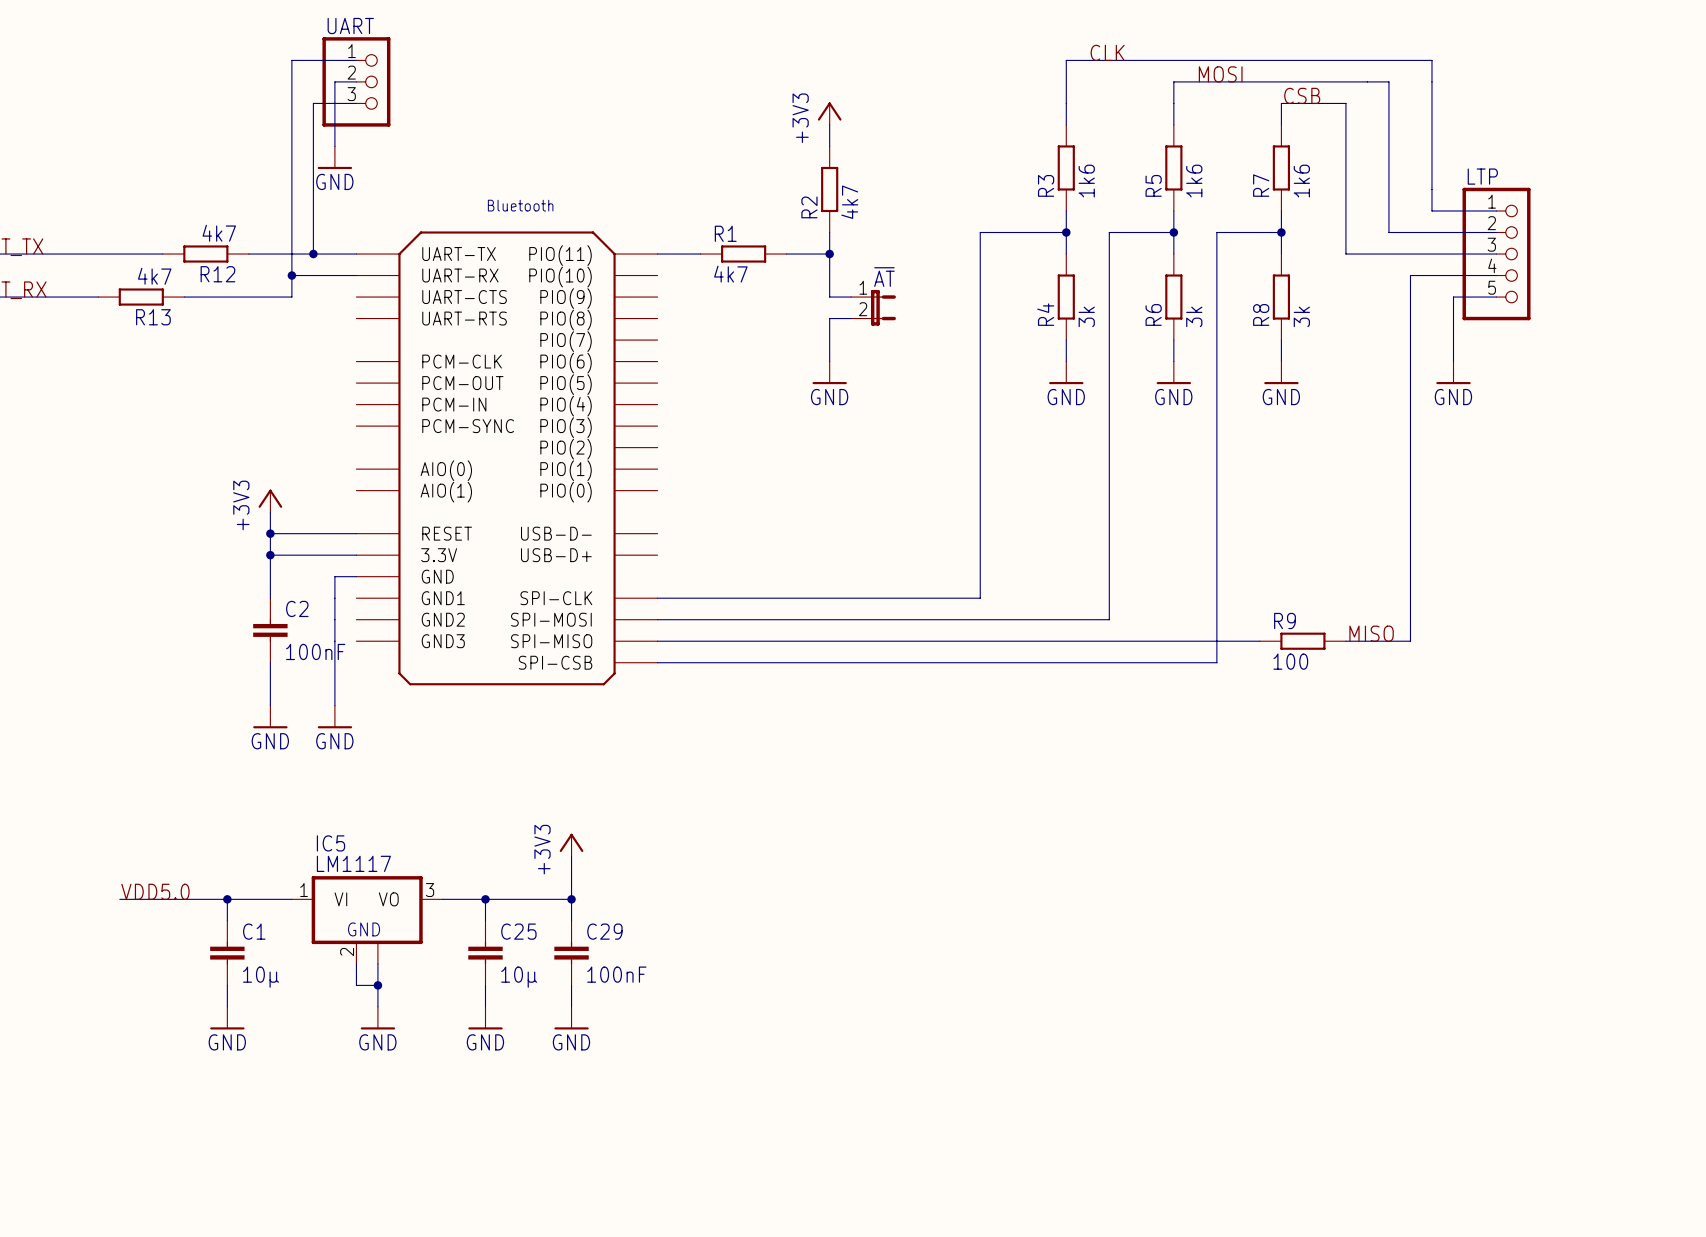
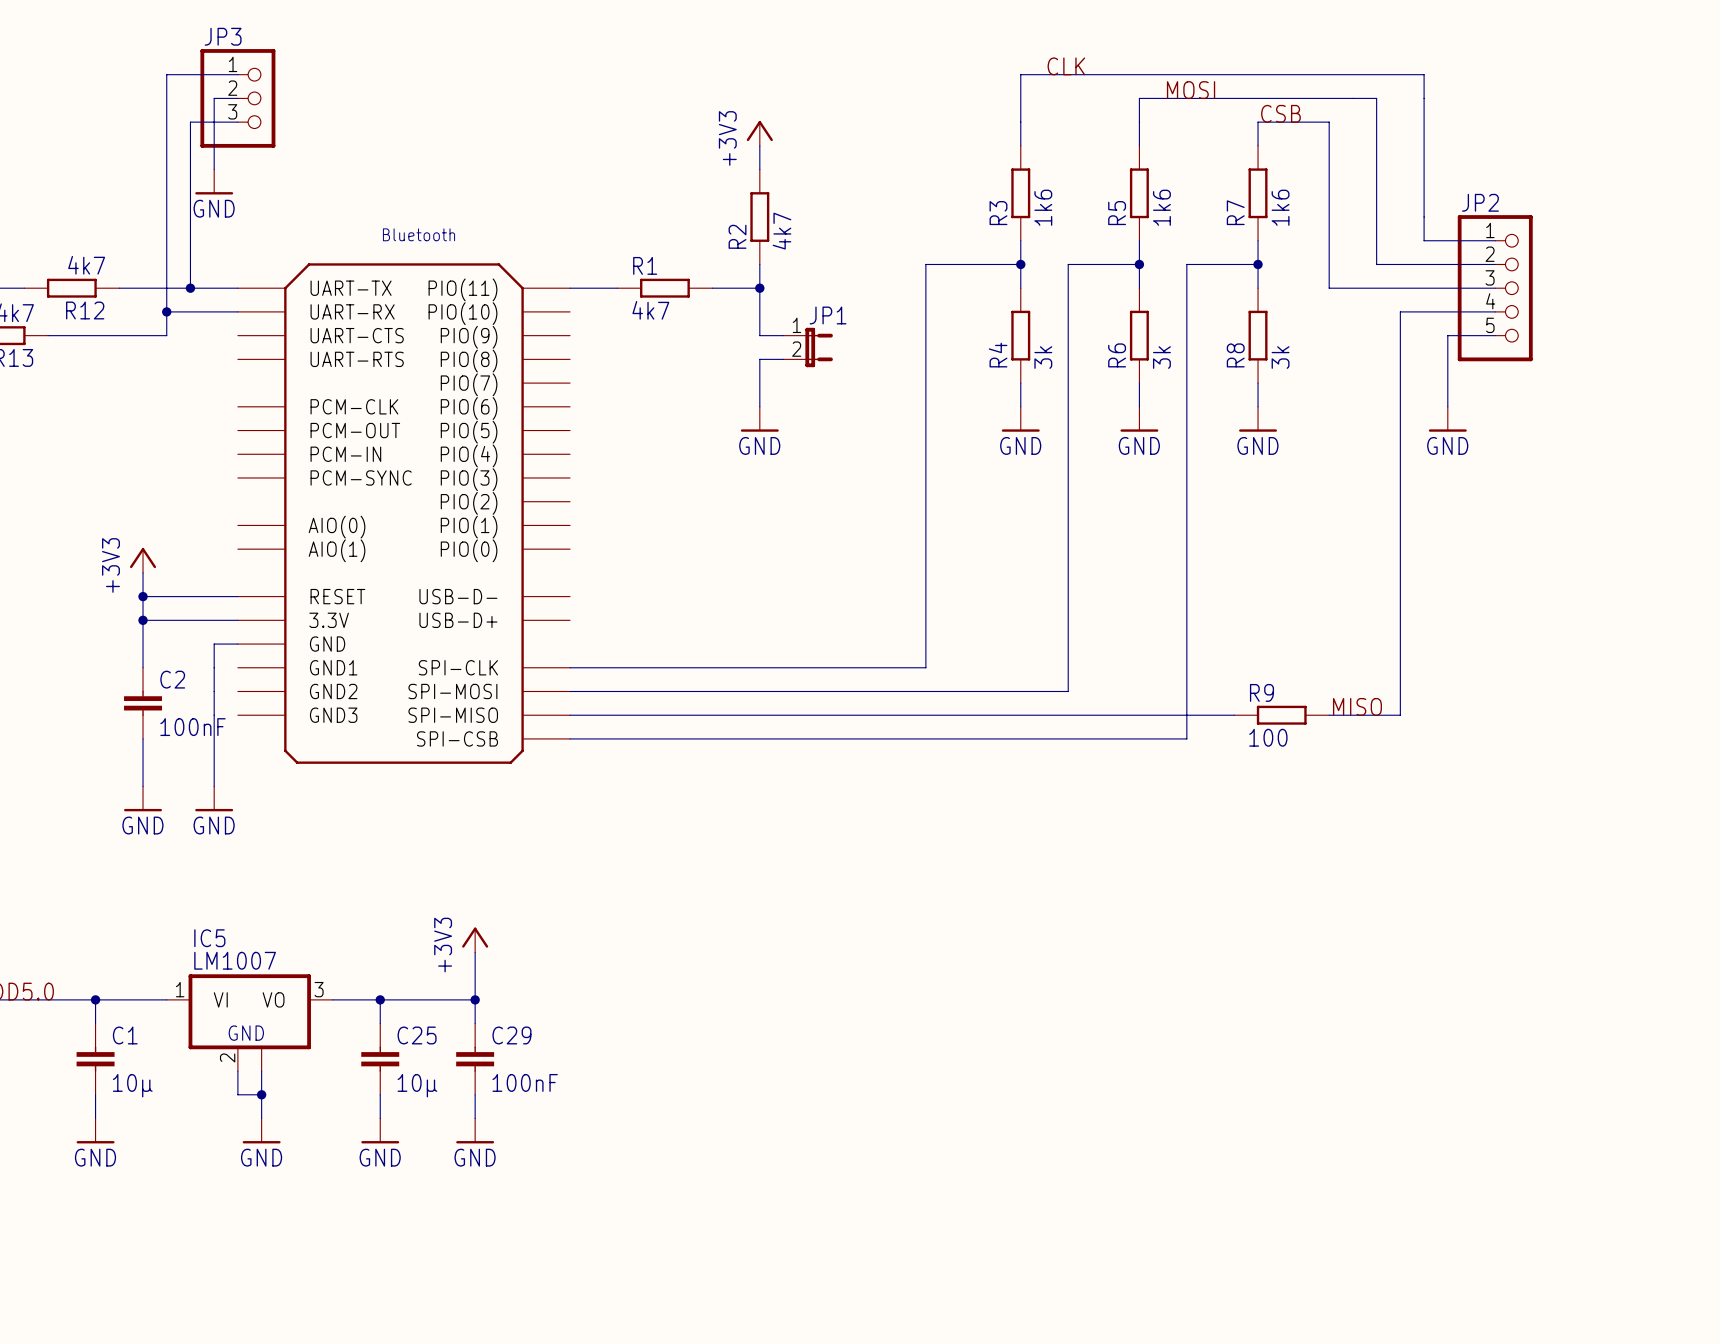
UART name: UART (350, 25) -> JP3 (223, 36)
LTP name: LTP (1482, 176) -> JP2 (1480, 202)
~{AT} name: ~{AT} (884, 277) -> JP1 (828, 315)
IC5 text: none -> LM1007 (235, 960)
IC5 text: LM1117 (353, 863) -> none

